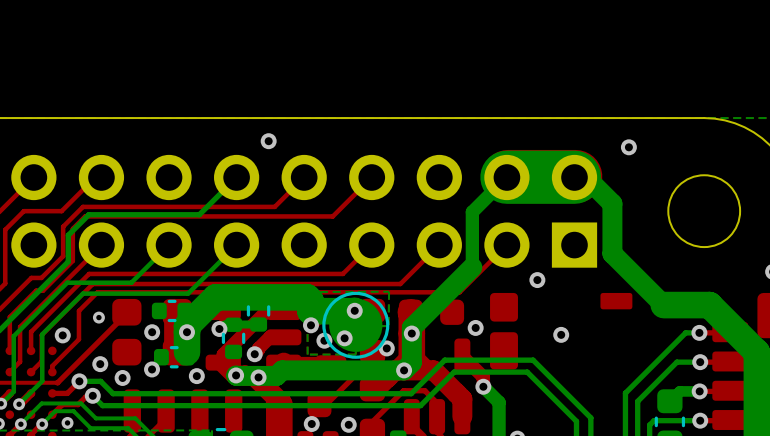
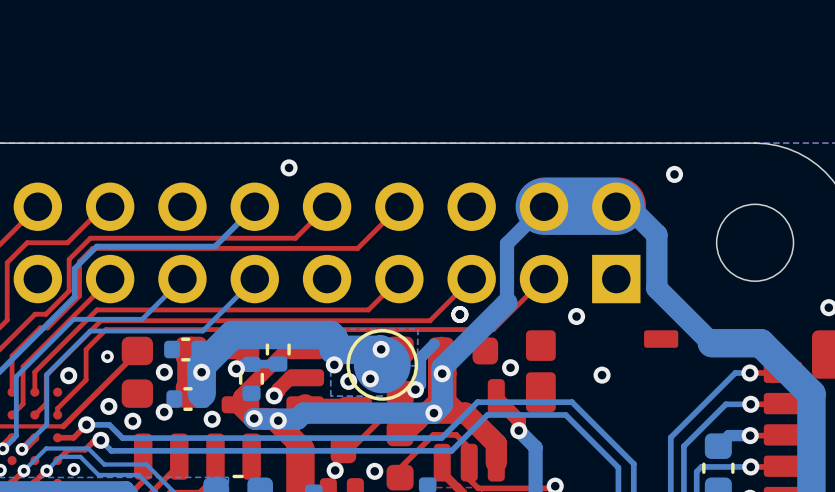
via: none -> (459, 314)
bottom track: none -> (434, 344) (420, 357) (420, 384) (415, 389)

